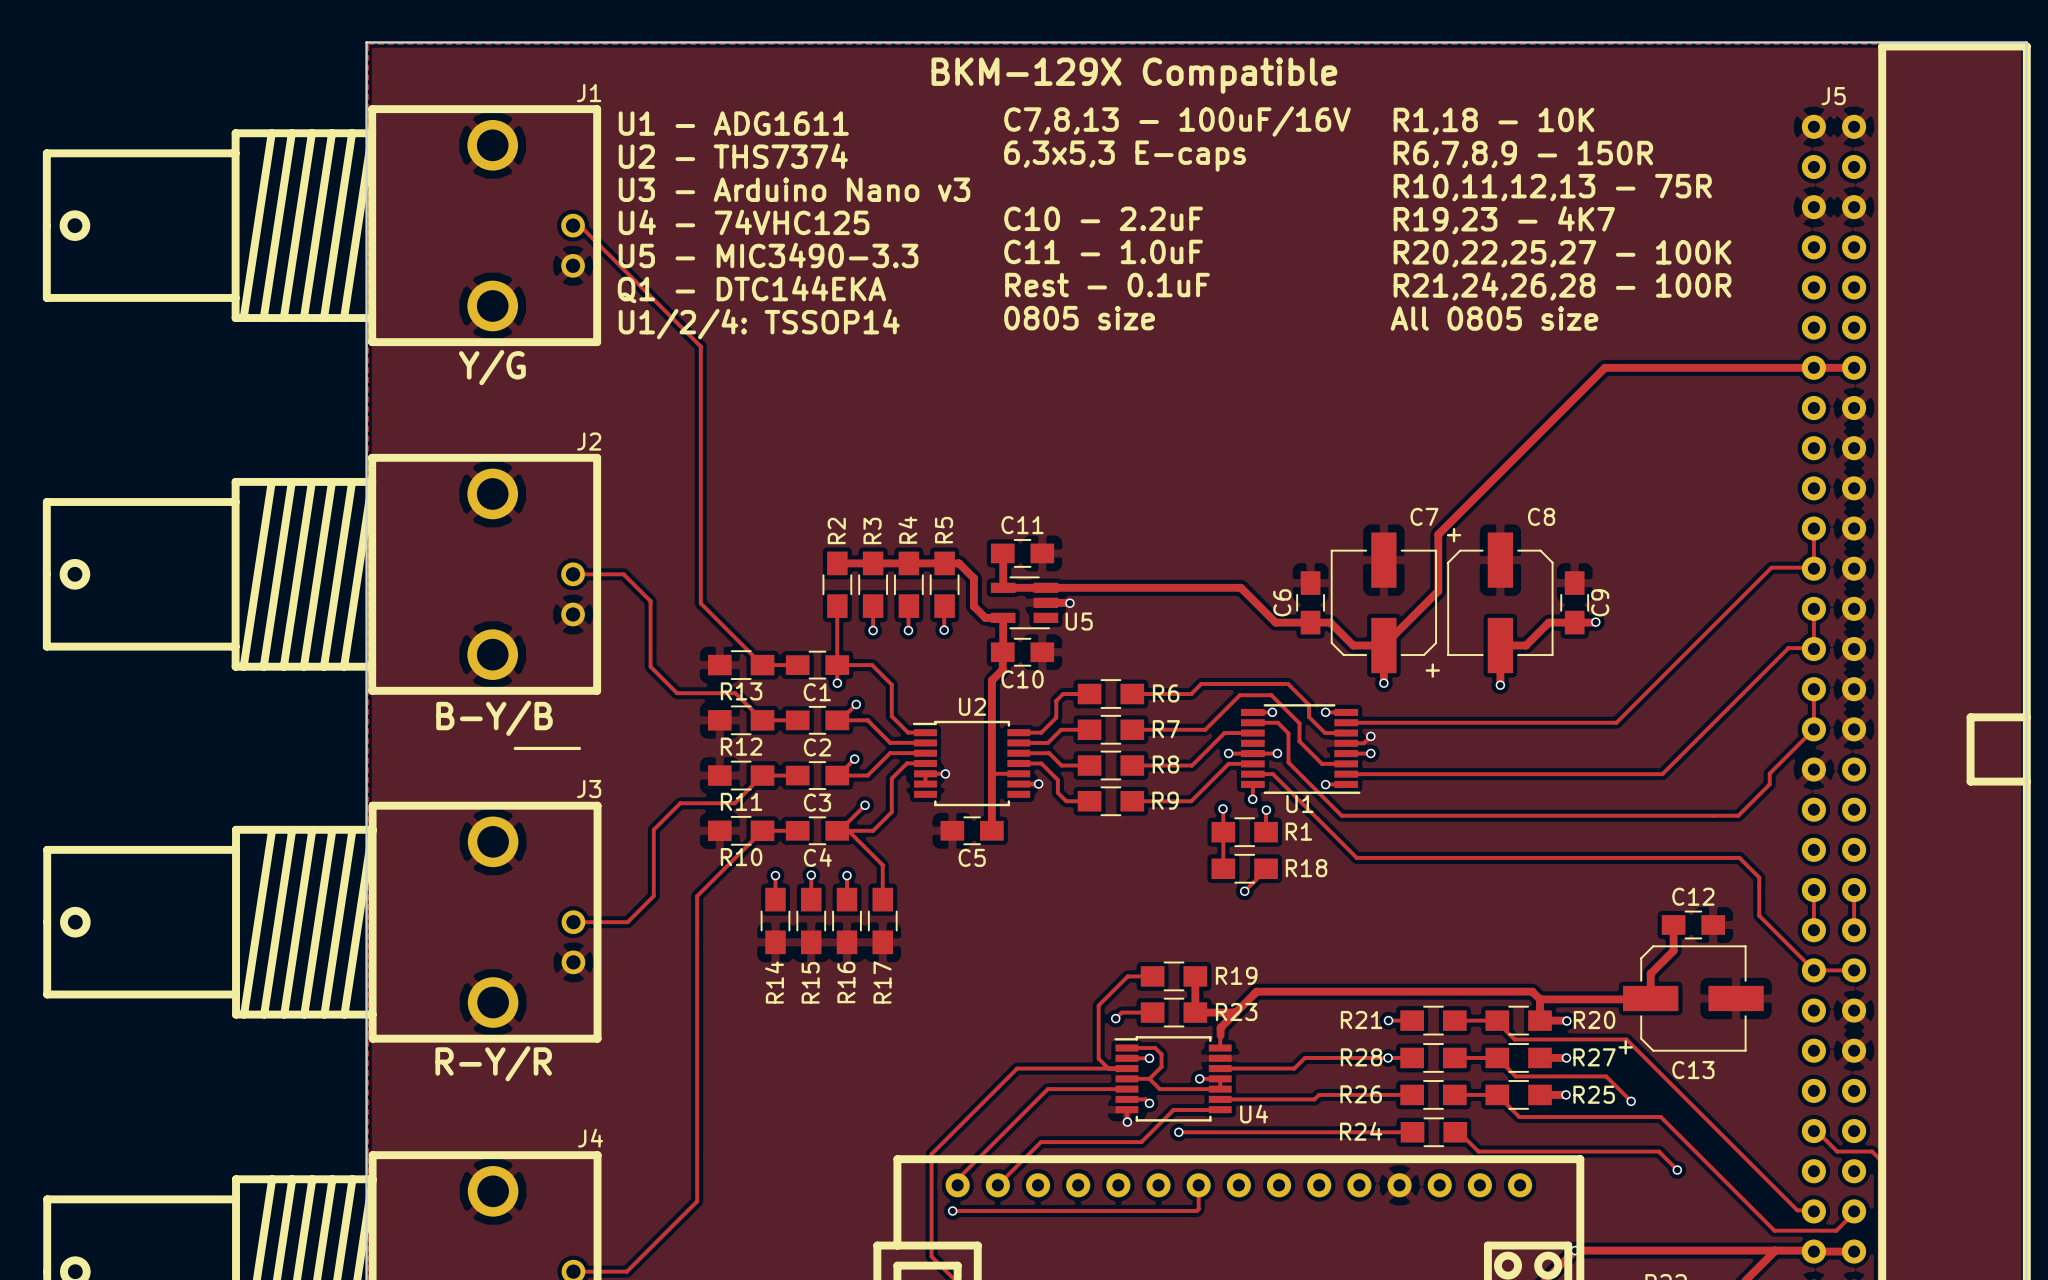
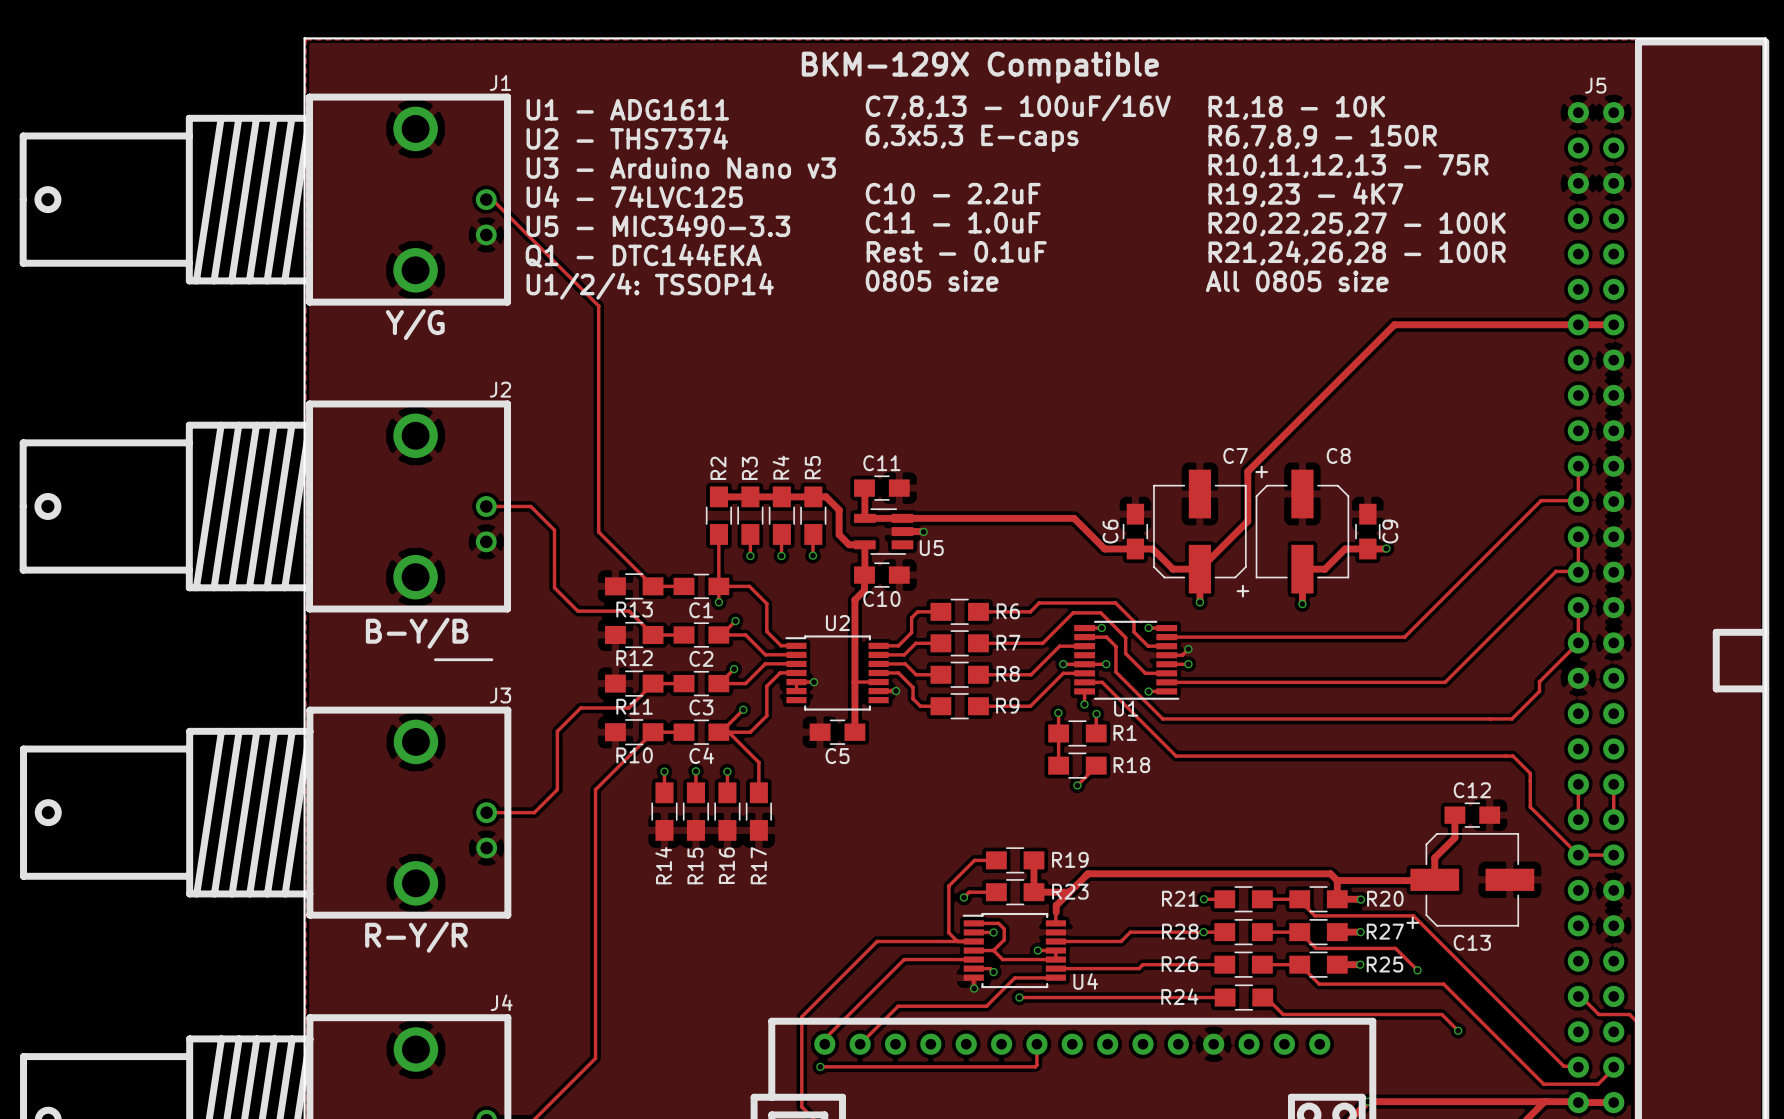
text: U4 - 74VHC125 (744, 222) -> U4 - 74LVC125 (634, 196)

